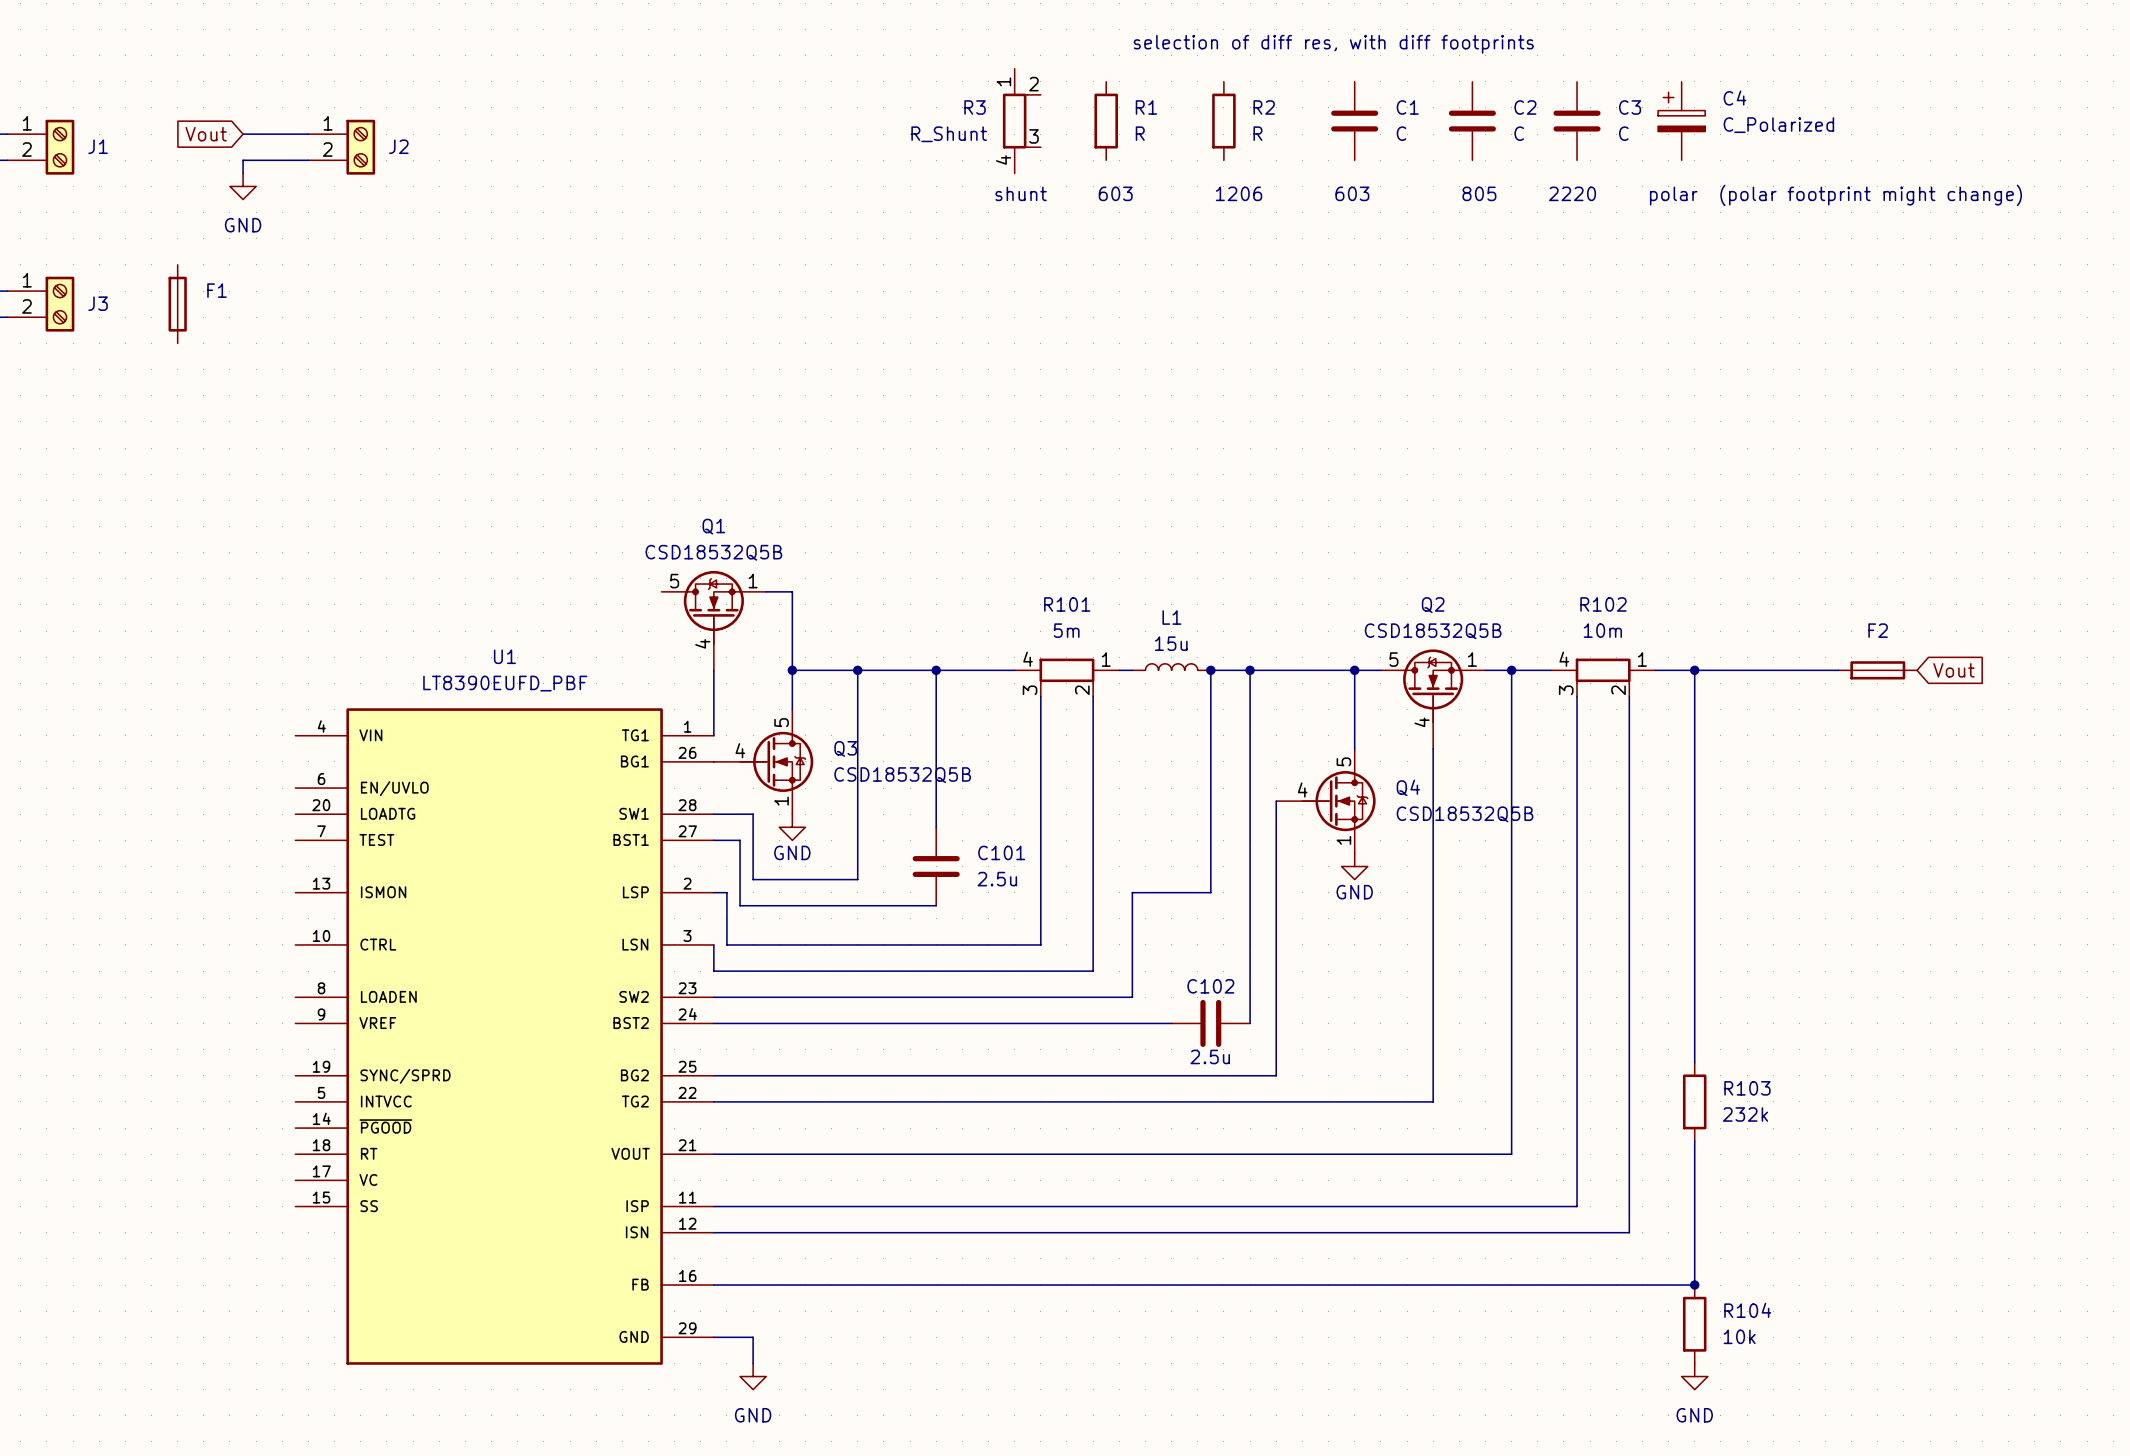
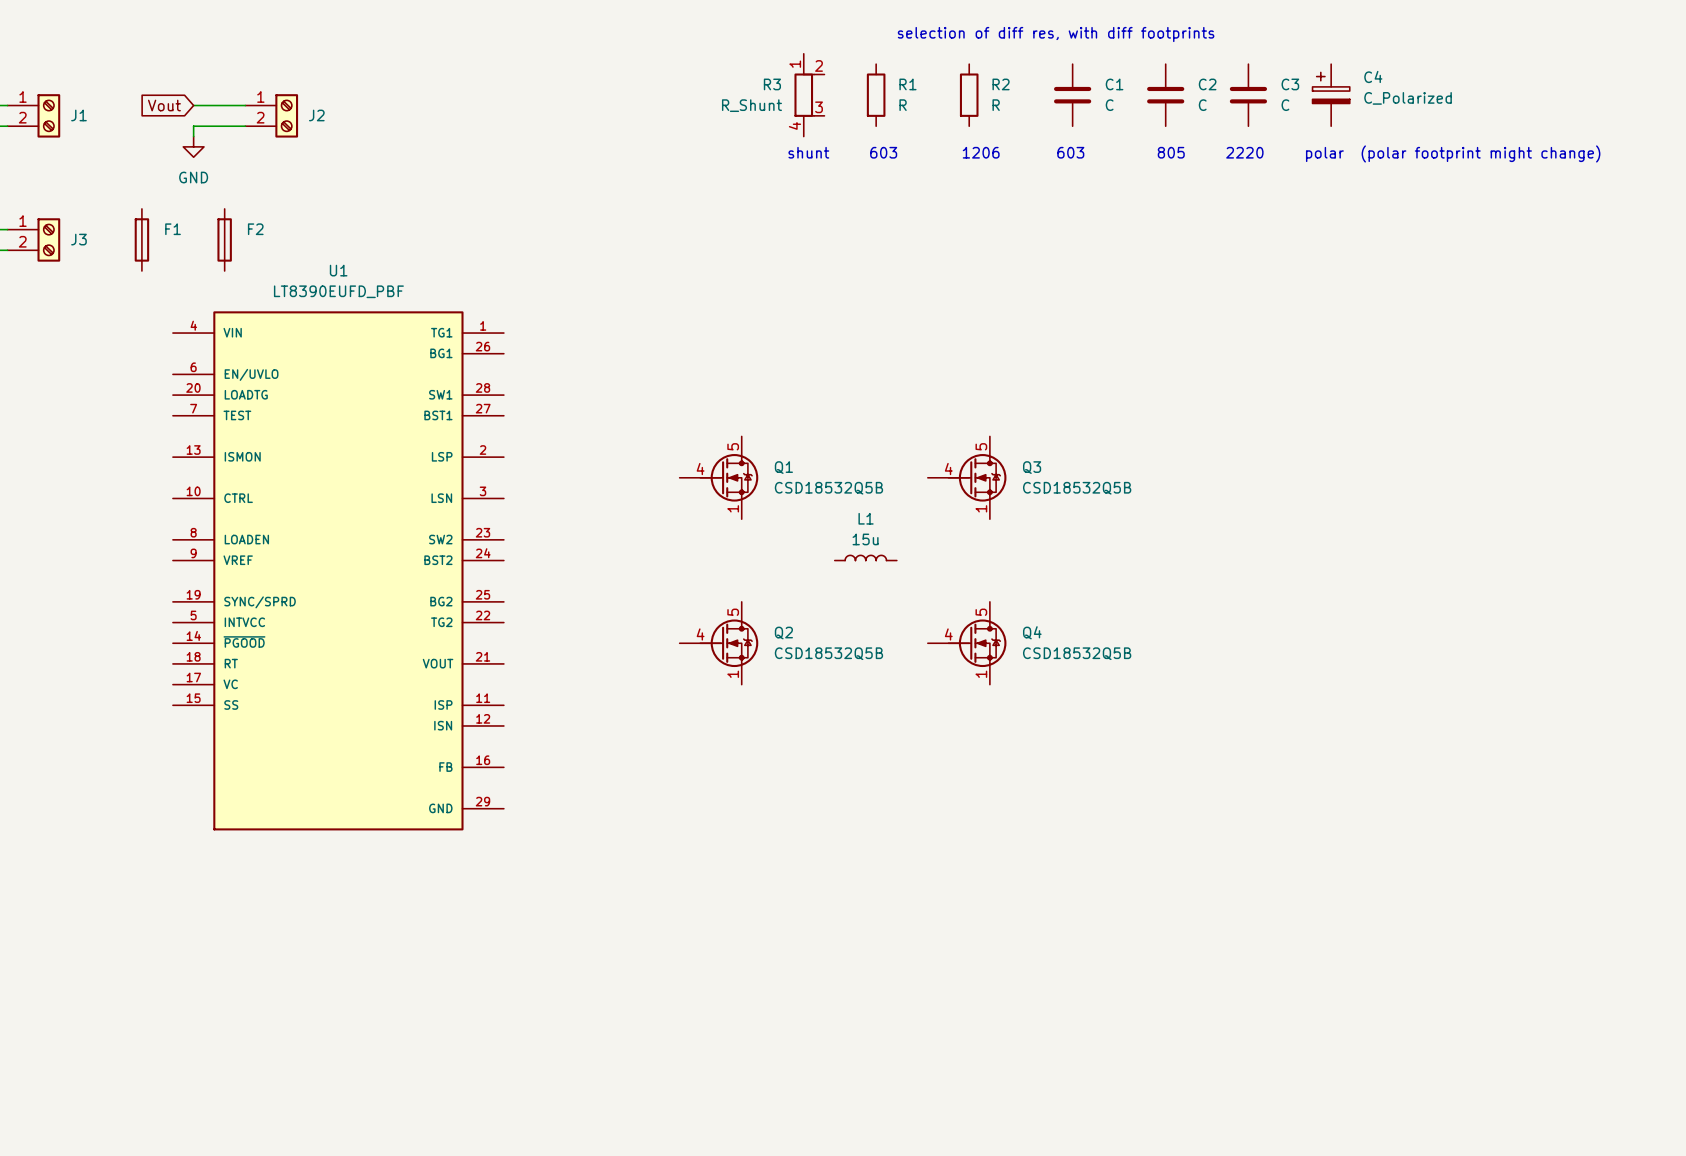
Q1 value position: CSD18532Q5B (713, 552) -> CSD18532Q5B (828, 488)
wire: (766, 591) (792, 591) (792, 709) -> none
Q1 rotation: 0° (713, 607) -> 90° clockwise (729, 477)
Q1 position: (713, 620) -> (718, 477)
Q2 value position: CSD18532Q5B (1433, 631) -> CSD18532Q5B (828, 653)
L1 position: (1171, 667) -> (865, 557)
wire: (713, 670) (713, 735) -> none
wire: (792, 670) (1014, 670) -> none
junction: (792, 670) -> none
wire: (857, 670) (857, 879) (753, 879) (753, 814) (713, 814) -> none
junction: (857, 670) -> none
wire: (936, 670) (936, 827) -> none
junction: (936, 670) -> none
wire: (1119, 670) (1132, 670) -> none
junction: (1210, 670) -> none
wire: (1250, 670) (1250, 1023) -> none
junction: (1250, 670) -> none
wire: (1354, 670) (1354, 748) -> none
junction: (1354, 670) -> none
wire: (1380, 670) (1210, 670) (1210, 892) (1132, 892) (1132, 997) (713, 997) -> none
wire: (1485, 670) (1550, 670) -> none
wire: (1511, 670) (1511, 1154) (713, 1154) -> none
junction: (1511, 670) -> none
wire: (1655, 670) (1838, 670) -> none
wire: (1694, 670) (1694, 1062) -> none
junction: (1694, 670) -> none
F2 rotation: 0° (1877, 670) -> 90° clockwise (224, 239)
F2 position: (1877, 670) -> (224, 239)
global label: Vout (1953, 670) -> none
R101: 5m (1066, 677) -> none
R102: 10m (1603, 677) -> none
Q2 rotation: 0° (1433, 686) -> 90° clockwise (729, 643)
wire: (1040, 696) (1040, 944) (726, 944) (726, 892) (713, 892) -> none
wire: (1093, 696) (1093, 971) (713, 971) (713, 944) -> none
wire: (1577, 696) (1577, 1206) (713, 1206) -> none
wire: (1629, 696) (1629, 1232) (713, 1232) -> none
Q2 position: (1433, 699) -> (718, 643)
wire: (1433, 748) (1433, 1101) (713, 1101) -> none
Q3 position: (763, 761) -> (967, 477)
wire: (1276, 801) (1276, 1075) (713, 1075) -> none
Q4 position: (1325, 801) -> (967, 643)
power symbol: GND (792, 827) -> none
wire: (713, 840) (740, 840) (740, 905) (936, 905) -> none
C101: 2.5u (936, 866) -> none
power symbol: GND (1354, 866) -> none
wire: (713, 1023) (1171, 1023) -> none
C102: 2.5u (1210, 1023) -> none
U1 position: (504, 1036) -> (338, 570)
R103: 232k (1694, 1101) -> none
wire: (1694, 1141) (1694, 1285) (713, 1285) -> none
junction: (1694, 1285) -> none
R104: 10k (1694, 1324) -> none
wire: (713, 1337) (753, 1337) (753, 1363) -> none
power symbol: GND (753, 1376) -> none
power symbol: GND (1694, 1376) -> none

